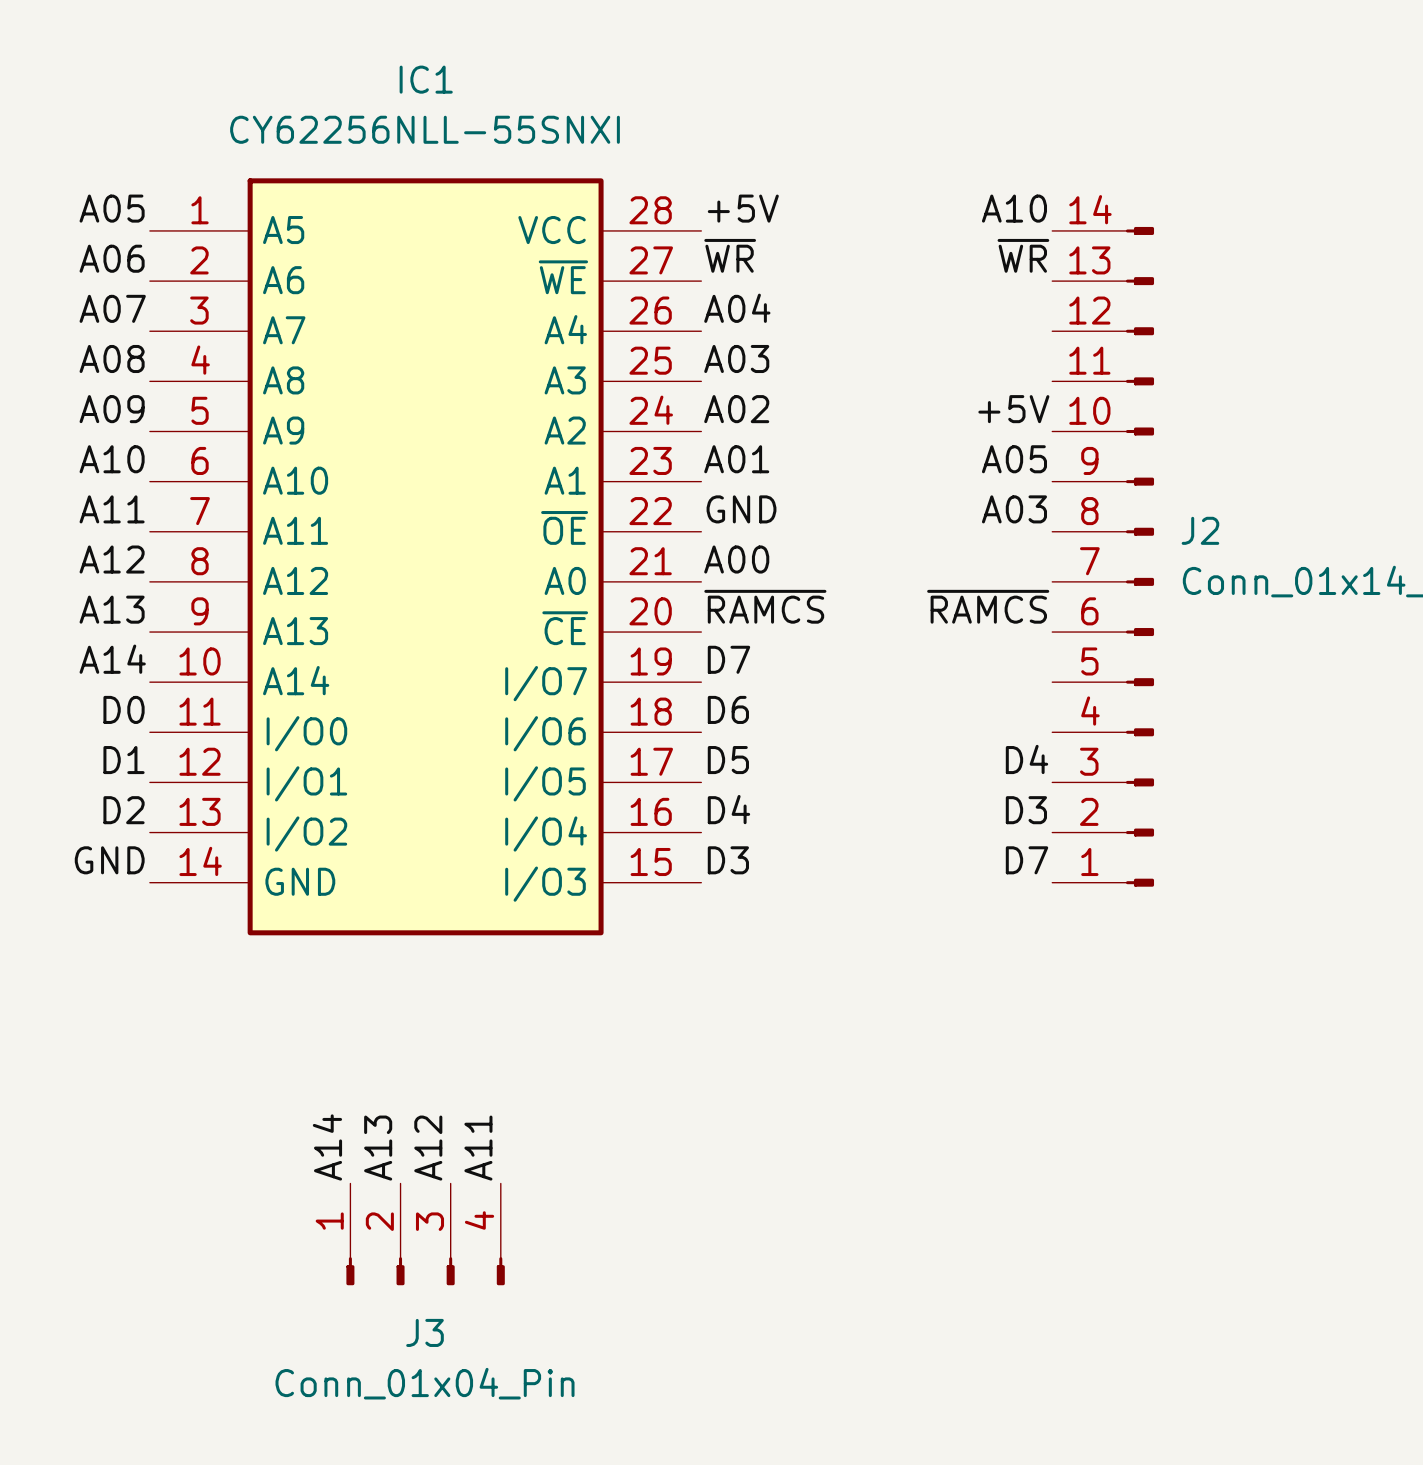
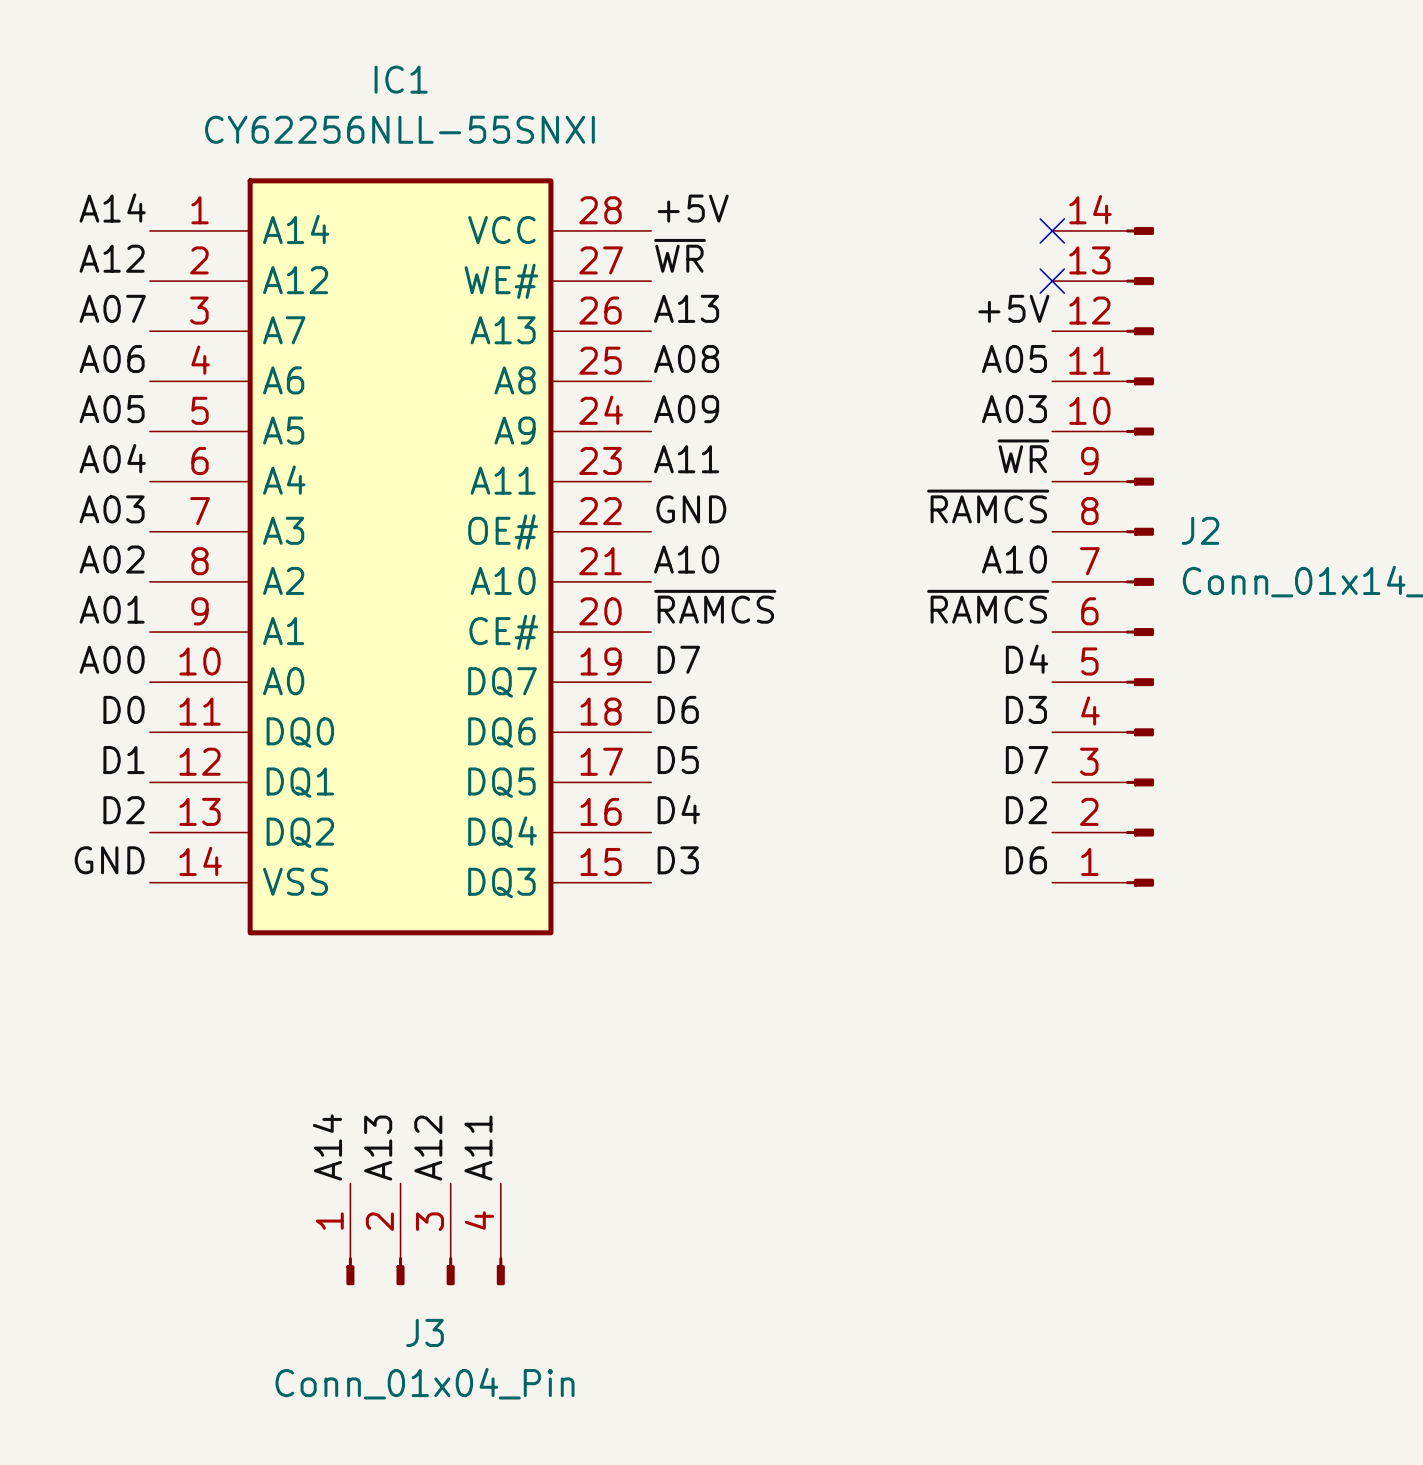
IC1 symbol: [149, 178, 702, 936] -> [149, 178, 652, 936]
label: A05 (112, 208) -> A14 (112, 208)
label position: +5V (743, 208) -> +5V (693, 208)
label: A10 (1014, 208) -> none
no-connect mark: none -> (1052, 230)
label position: ~{WR} (730, 255) -> ~{WR} (680, 255)
label: ~{WR} (1023, 255) -> none
label: A06 (112, 258) -> A12 (112, 258)
no-connect mark: none -> (1052, 281)
label: none -> A13 (686, 308)
label: A04 (737, 308) -> none
label: none -> +5V (1013, 308)
label: A08 (112, 358) -> A06 (112, 358)
label: none -> A08 (686, 358)
label: A03 (736, 358) -> none
label: none -> A05 (1014, 358)
label: A09 (112, 409) -> A05 (112, 409)
label: none -> A09 (686, 409)
label: A02 (736, 409) -> none
label: +5V (1013, 409) -> A03 (1014, 409)
label: A10 (112, 459) -> A04 (112, 458)
label: none -> A11 (686, 459)
label: A01 (736, 459) -> none
label: A05 (1014, 459) -> ~{WR} (1023, 456)
label: A11 (112, 509) -> A03 (112, 509)
label position: GND (741, 509) -> GND (691, 509)
label: A03 (1014, 509) -> ~{RAMCS} (988, 506)
label: A12 (112, 559) -> A02 (112, 559)
label: A00 (736, 559) -> A10 (686, 559)
label: none -> A10 (1014, 559)
label position: ~{RAMCS} (765, 606) -> ~{RAMCS} (715, 606)
label: A13 (112, 609) -> A01 (112, 609)
label: A14 (112, 659) -> A00 (112, 659)
label position: D7 (728, 659) -> D7 (678, 659)
label: none -> D4 (1027, 659)
label position: D6 (728, 709) -> D6 (678, 709)
label: none -> D3 (1026, 709)
label: D4 (1027, 759) -> D7 (1027, 760)
label position: D5 (728, 760) -> D5 (678, 760)
label position: D4 (728, 809) -> D4 (678, 809)
label: D3 (1026, 810) -> D2 (1026, 810)
label position: D3 (728, 860) -> D3 (678, 860)
label: D7 (1027, 860) -> D6 (1026, 860)

